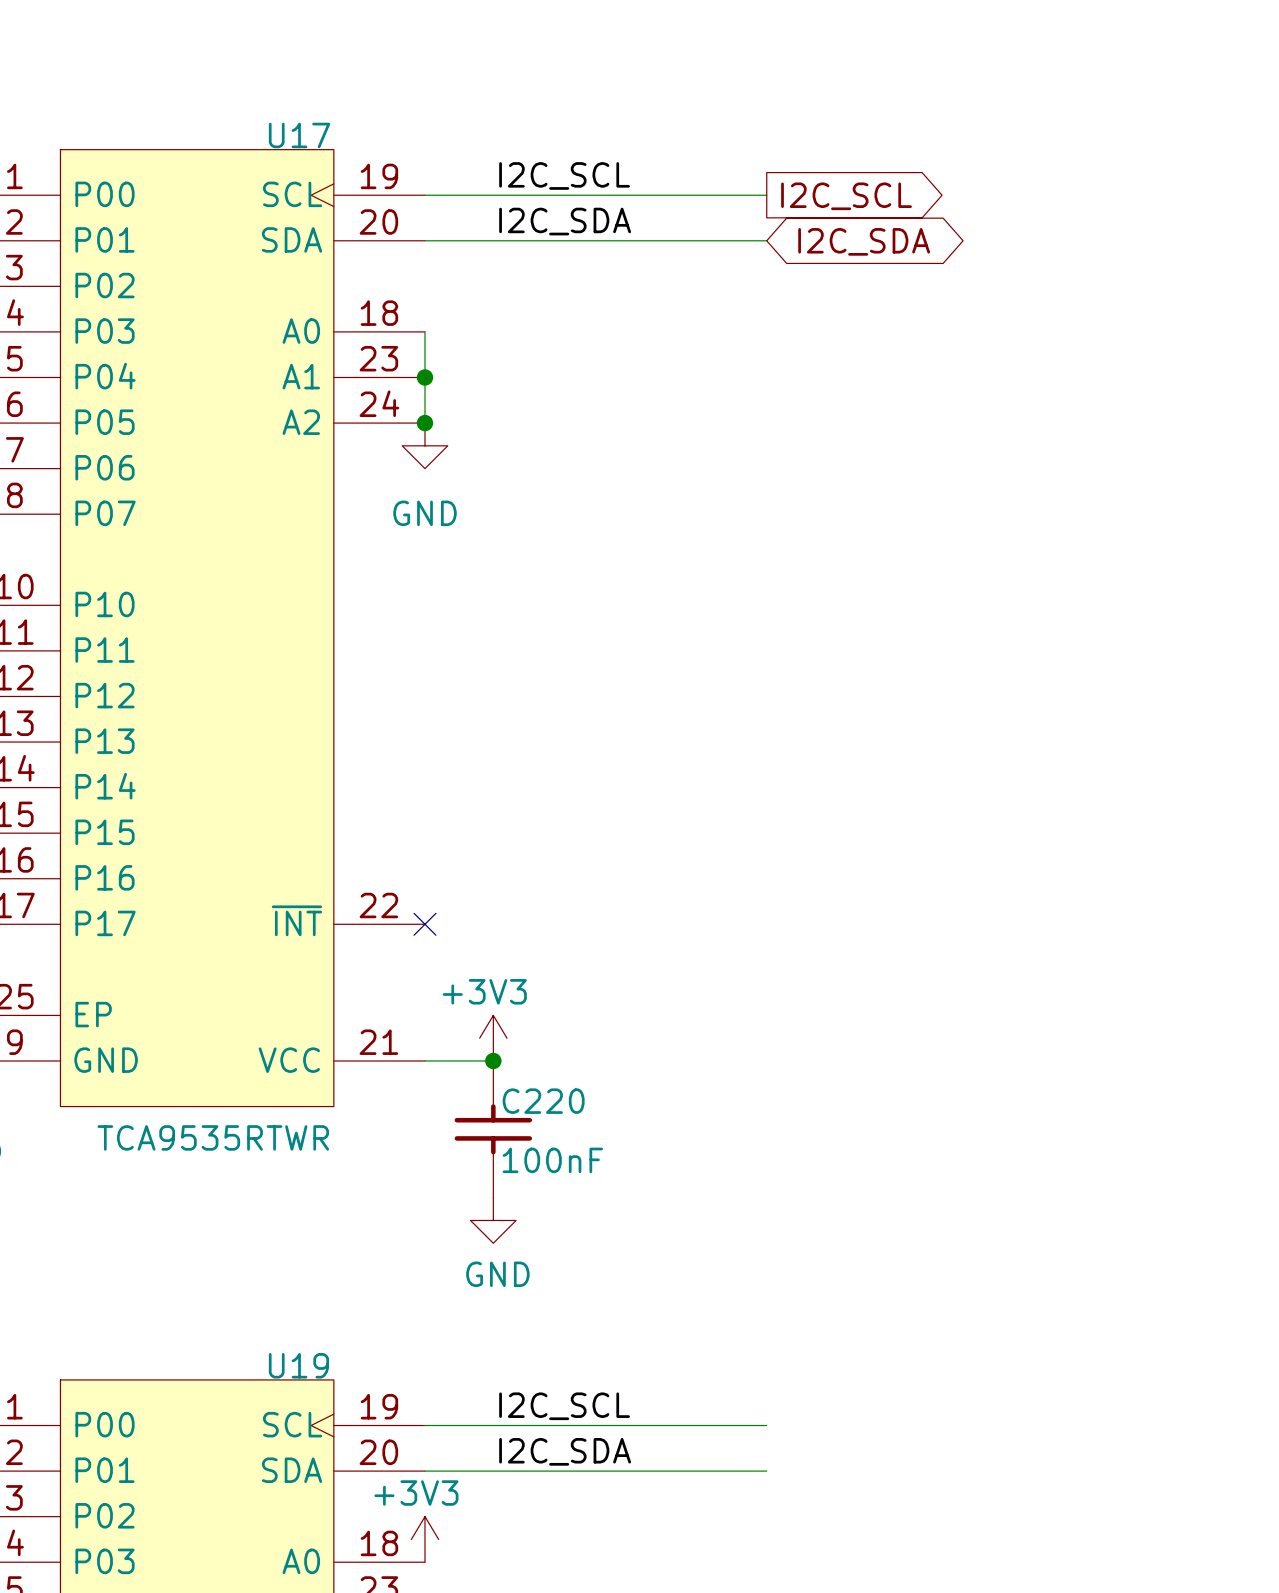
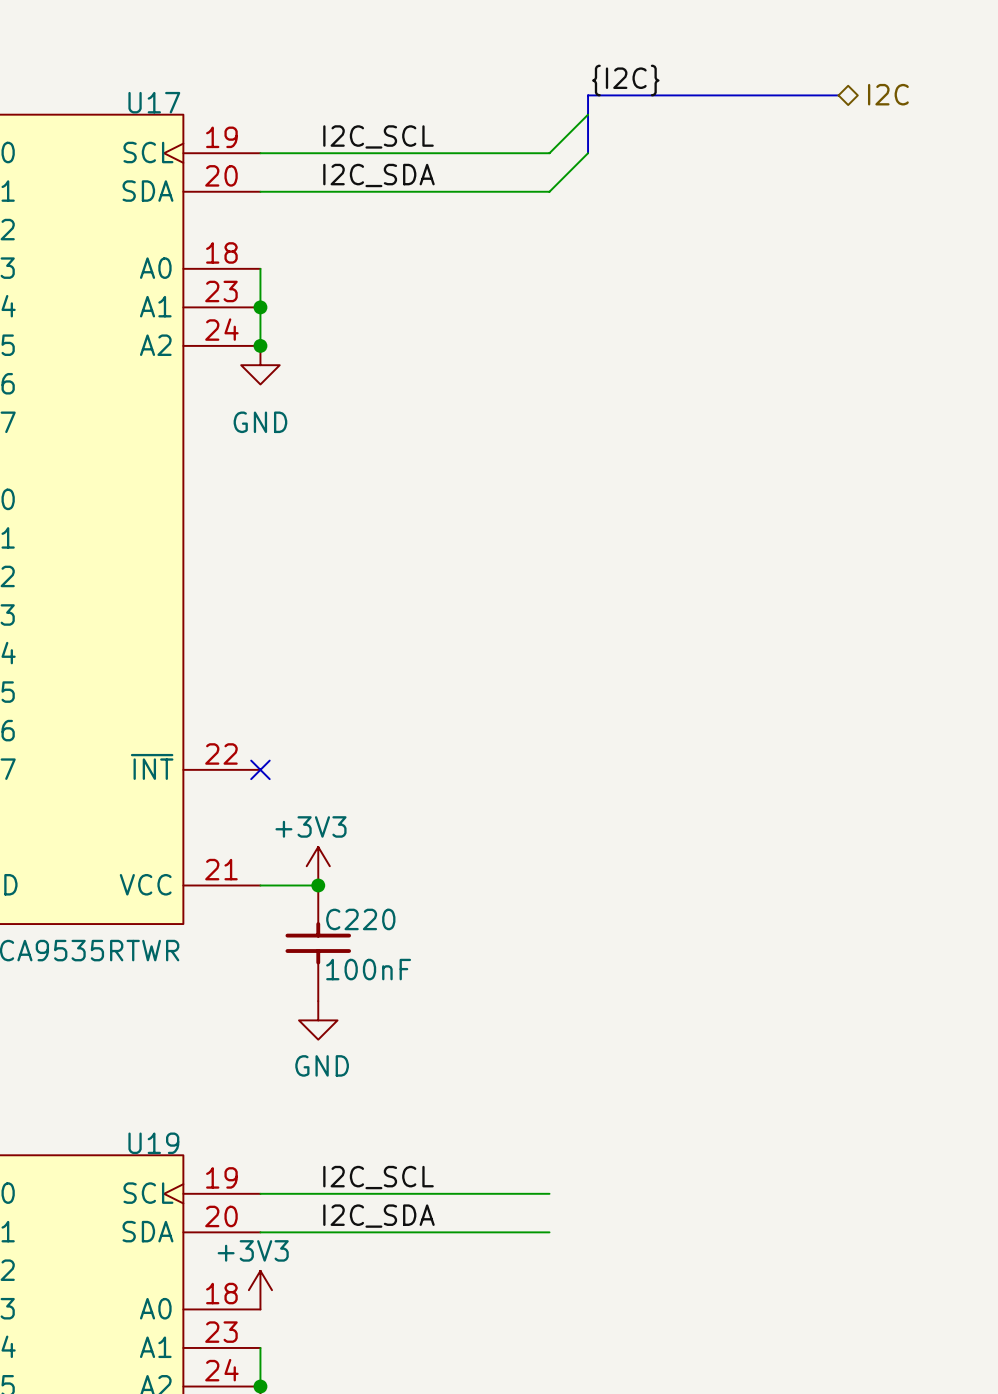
label: none -> {I2C} (625, 80)
bus: none -> (838, 95) (588, 95) (588, 153)
hierarchical label: none -> I2C (888, 94)
wire: none -> (588, 114) (549, 153)
wire: none -> (588, 153) (549, 191)
global label: I2C_SCL (846, 196) -> none
global label: I2C_SDA (864, 241) -> none

